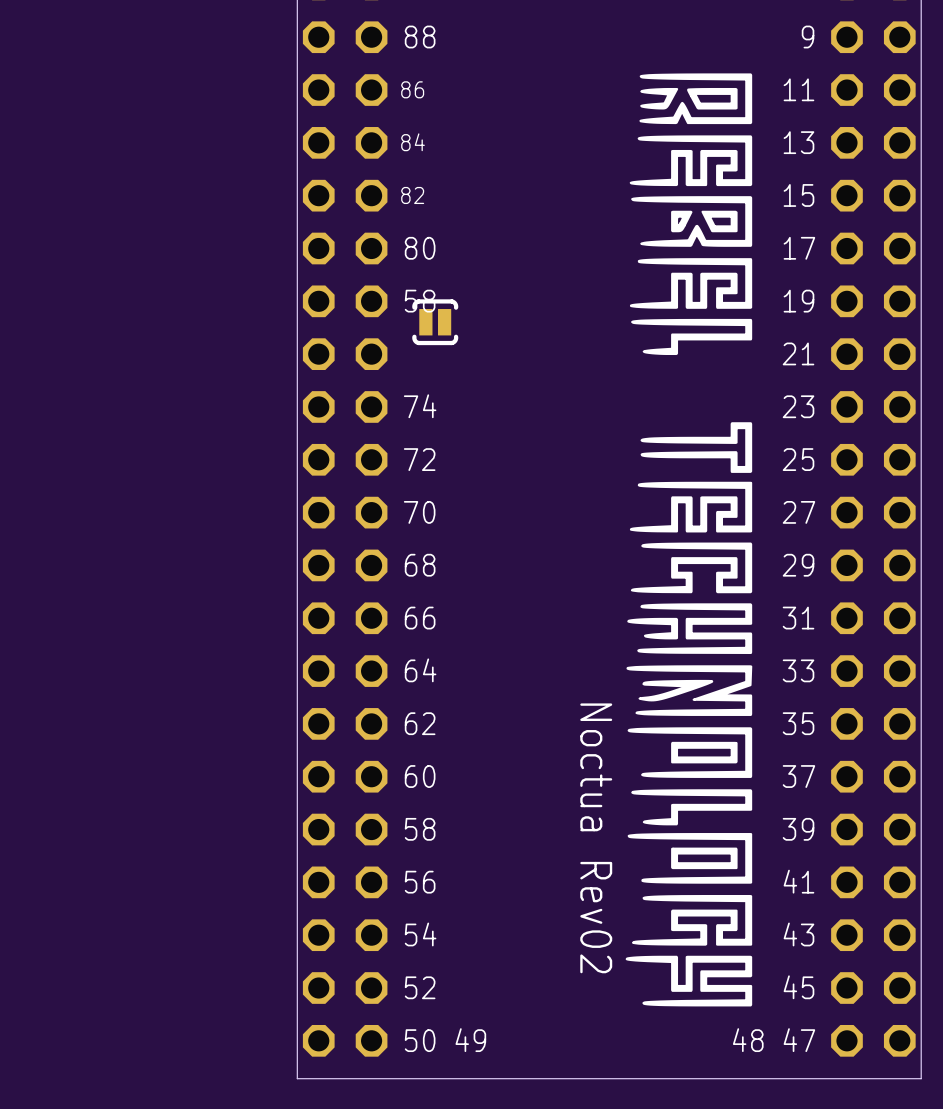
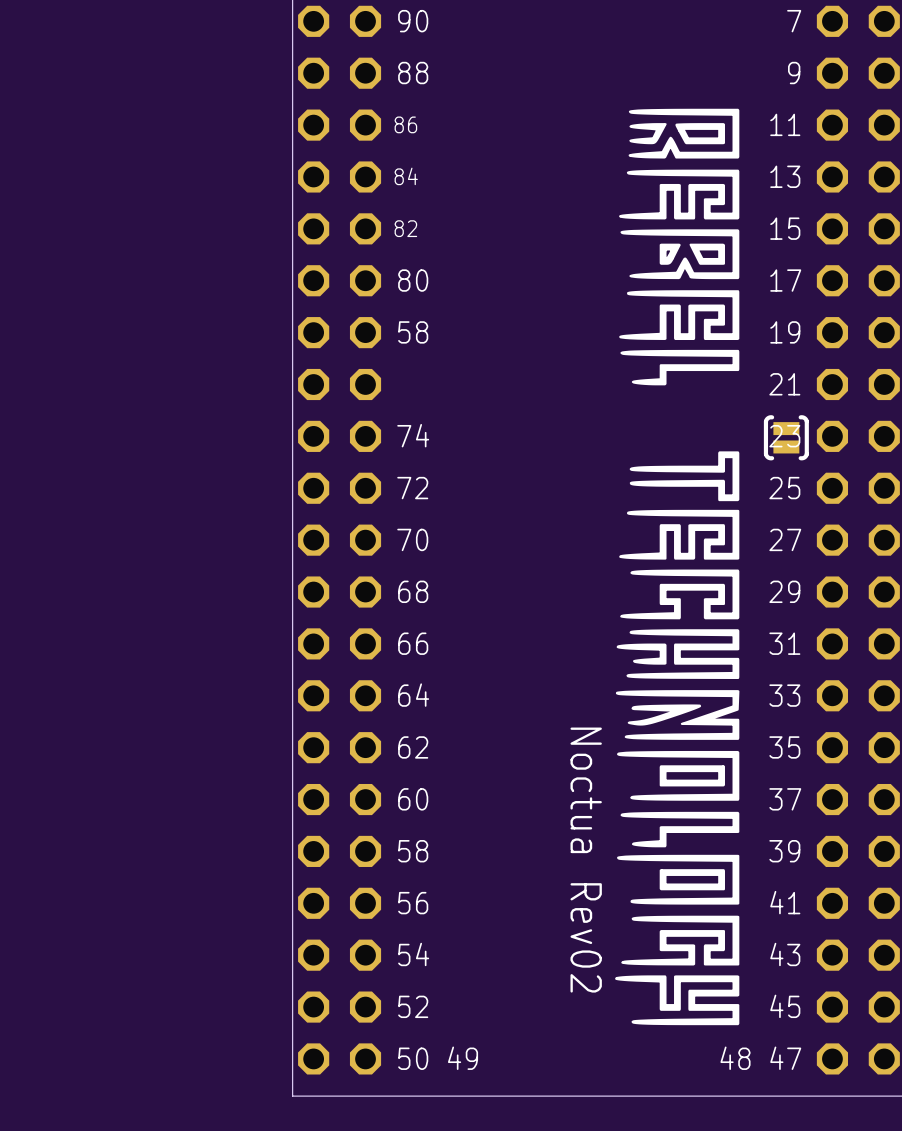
part rotation: 0° (435, 322) -> 90° clockwise (786, 437)
part position: (435, 322) -> (786, 437)

